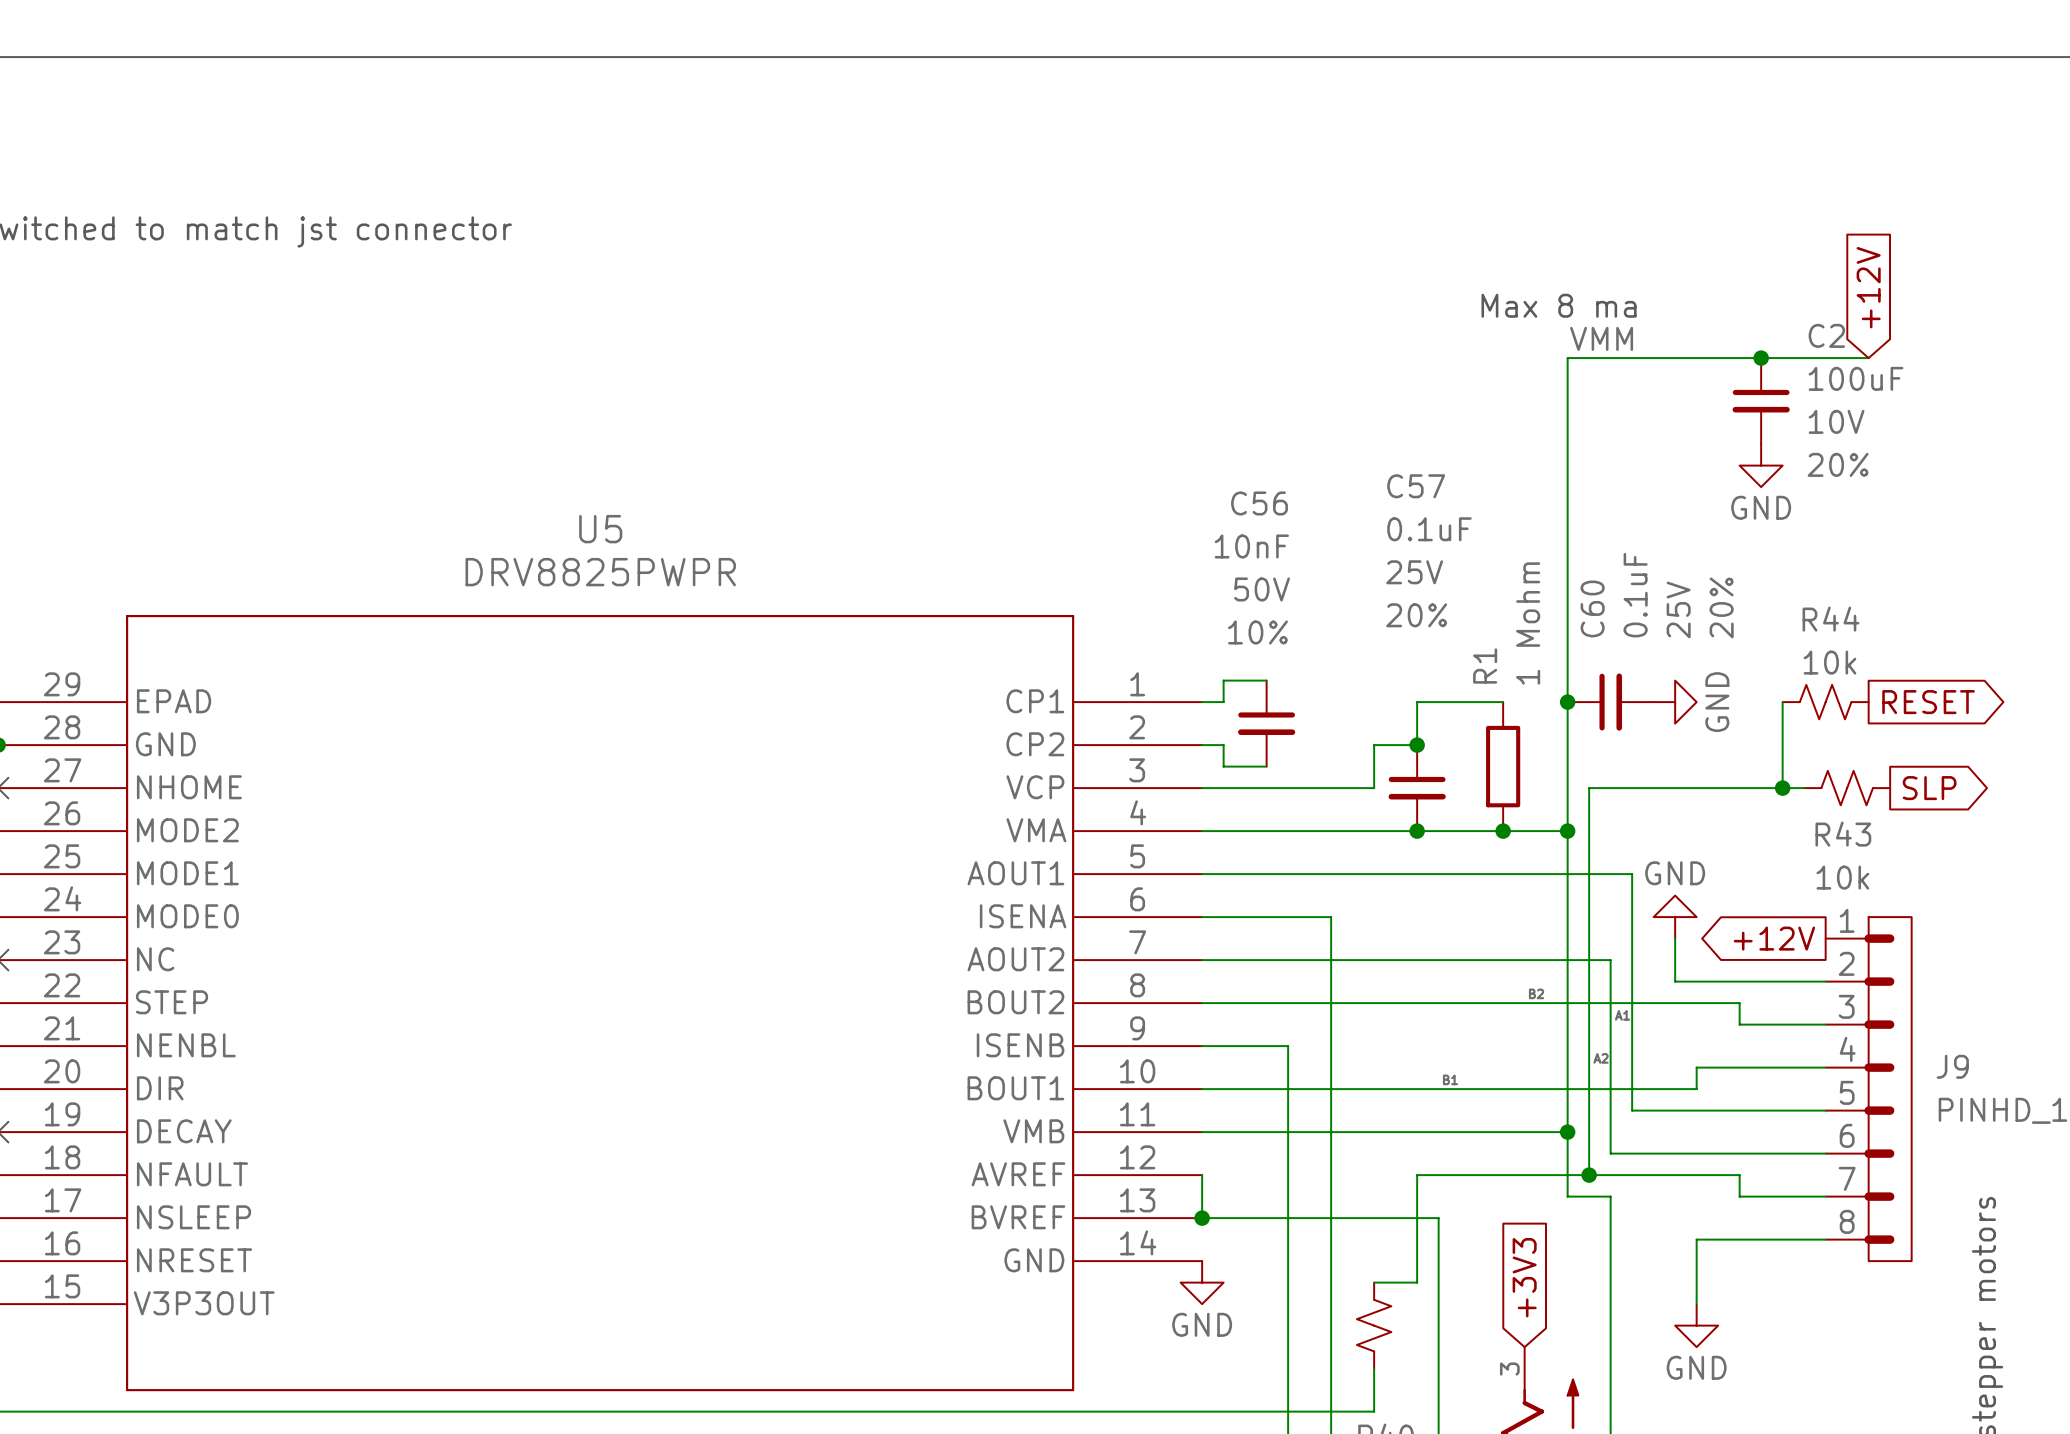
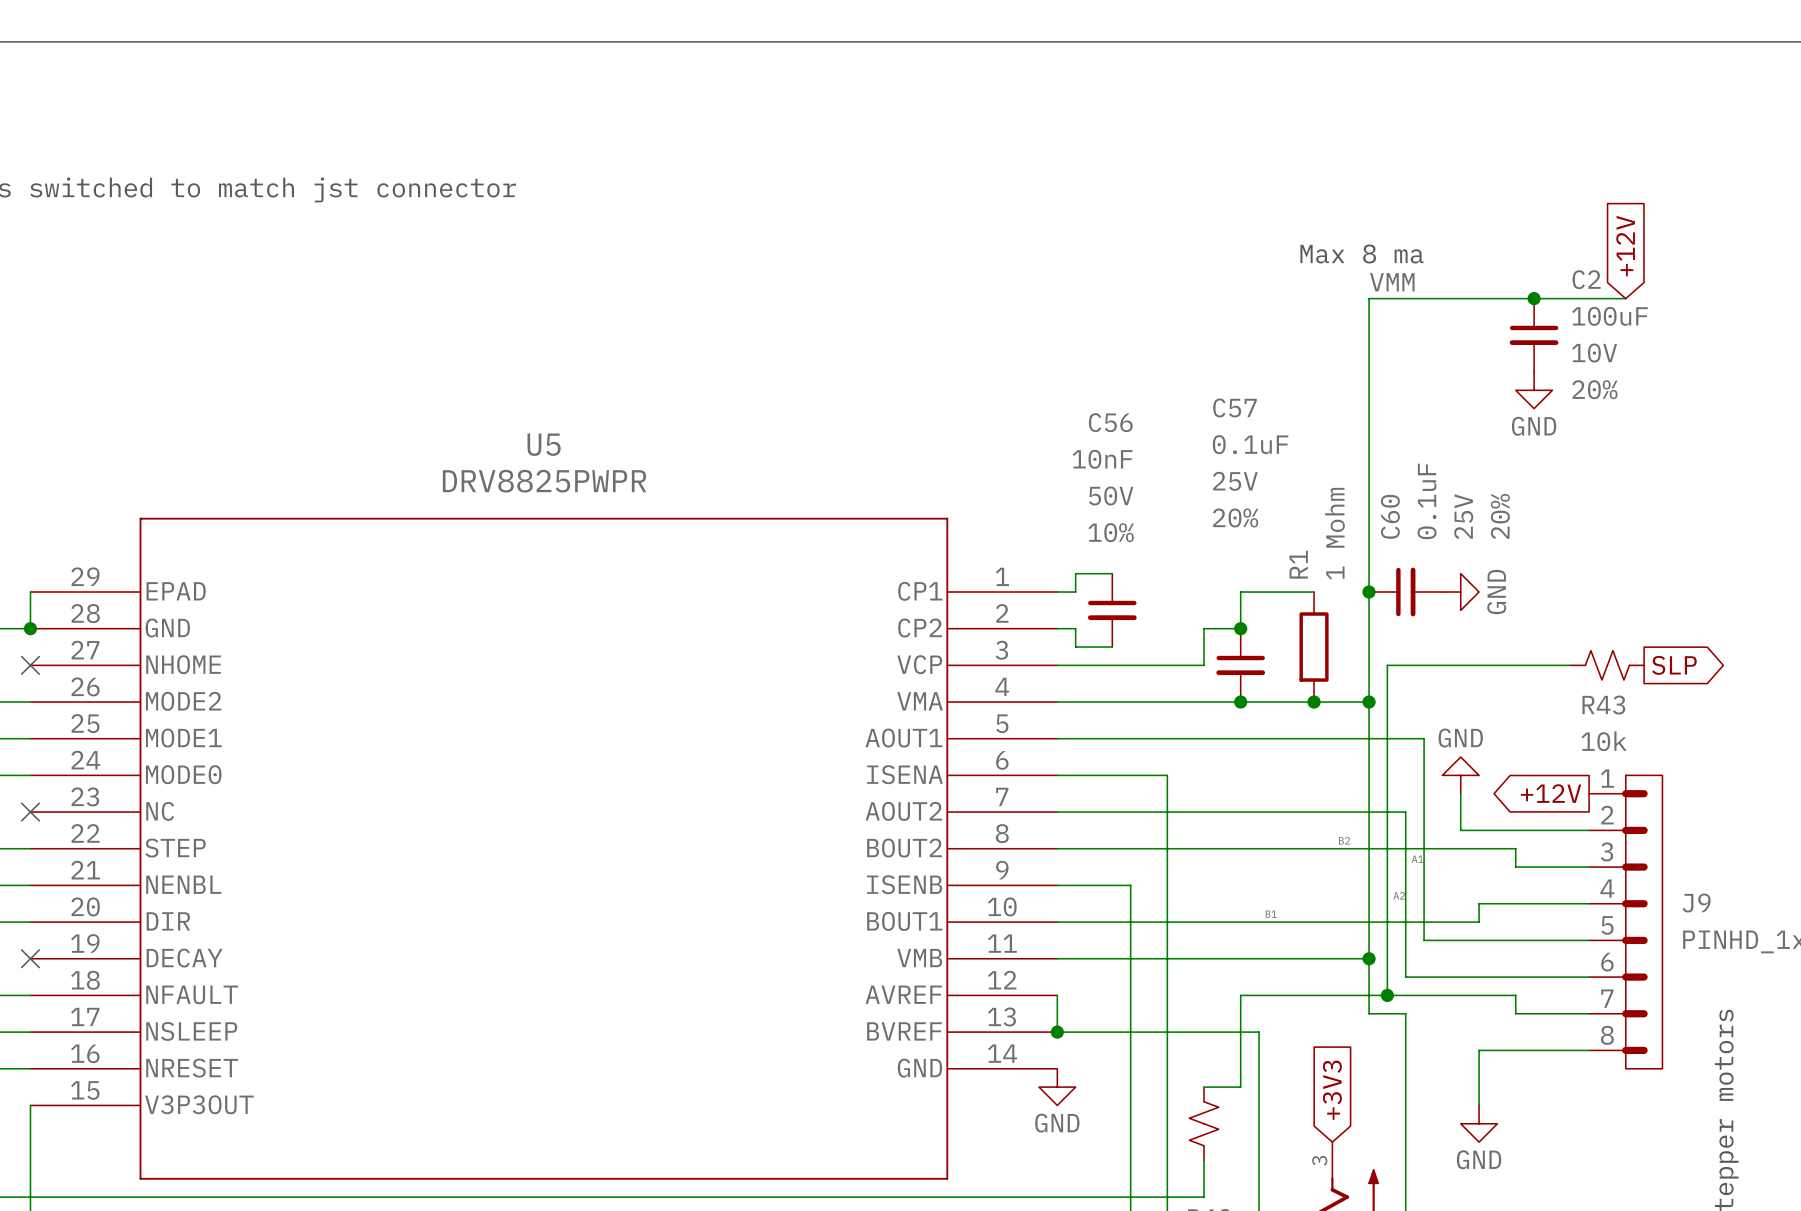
wire: (1782, 702) (1782, 788) -> none
R44: 10k (1825, 702) -> none
global label: RESET (1928, 702) -> none
junction: (1782, 788) -> none

